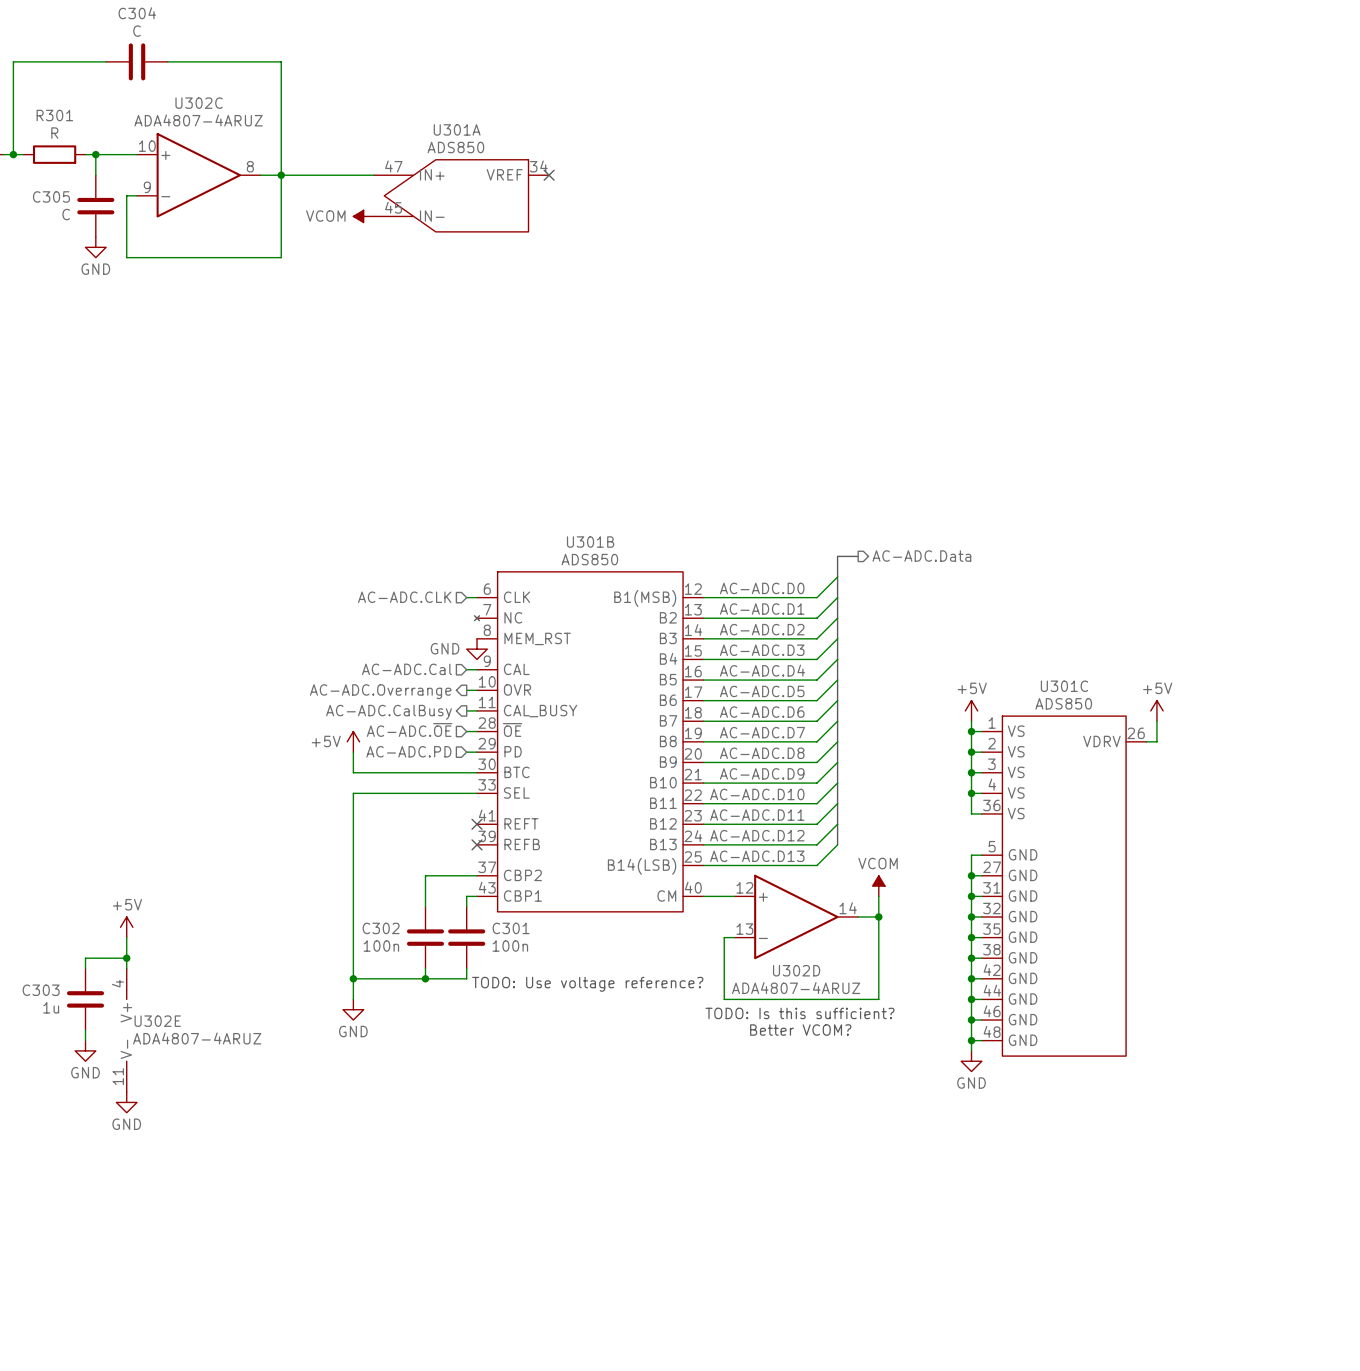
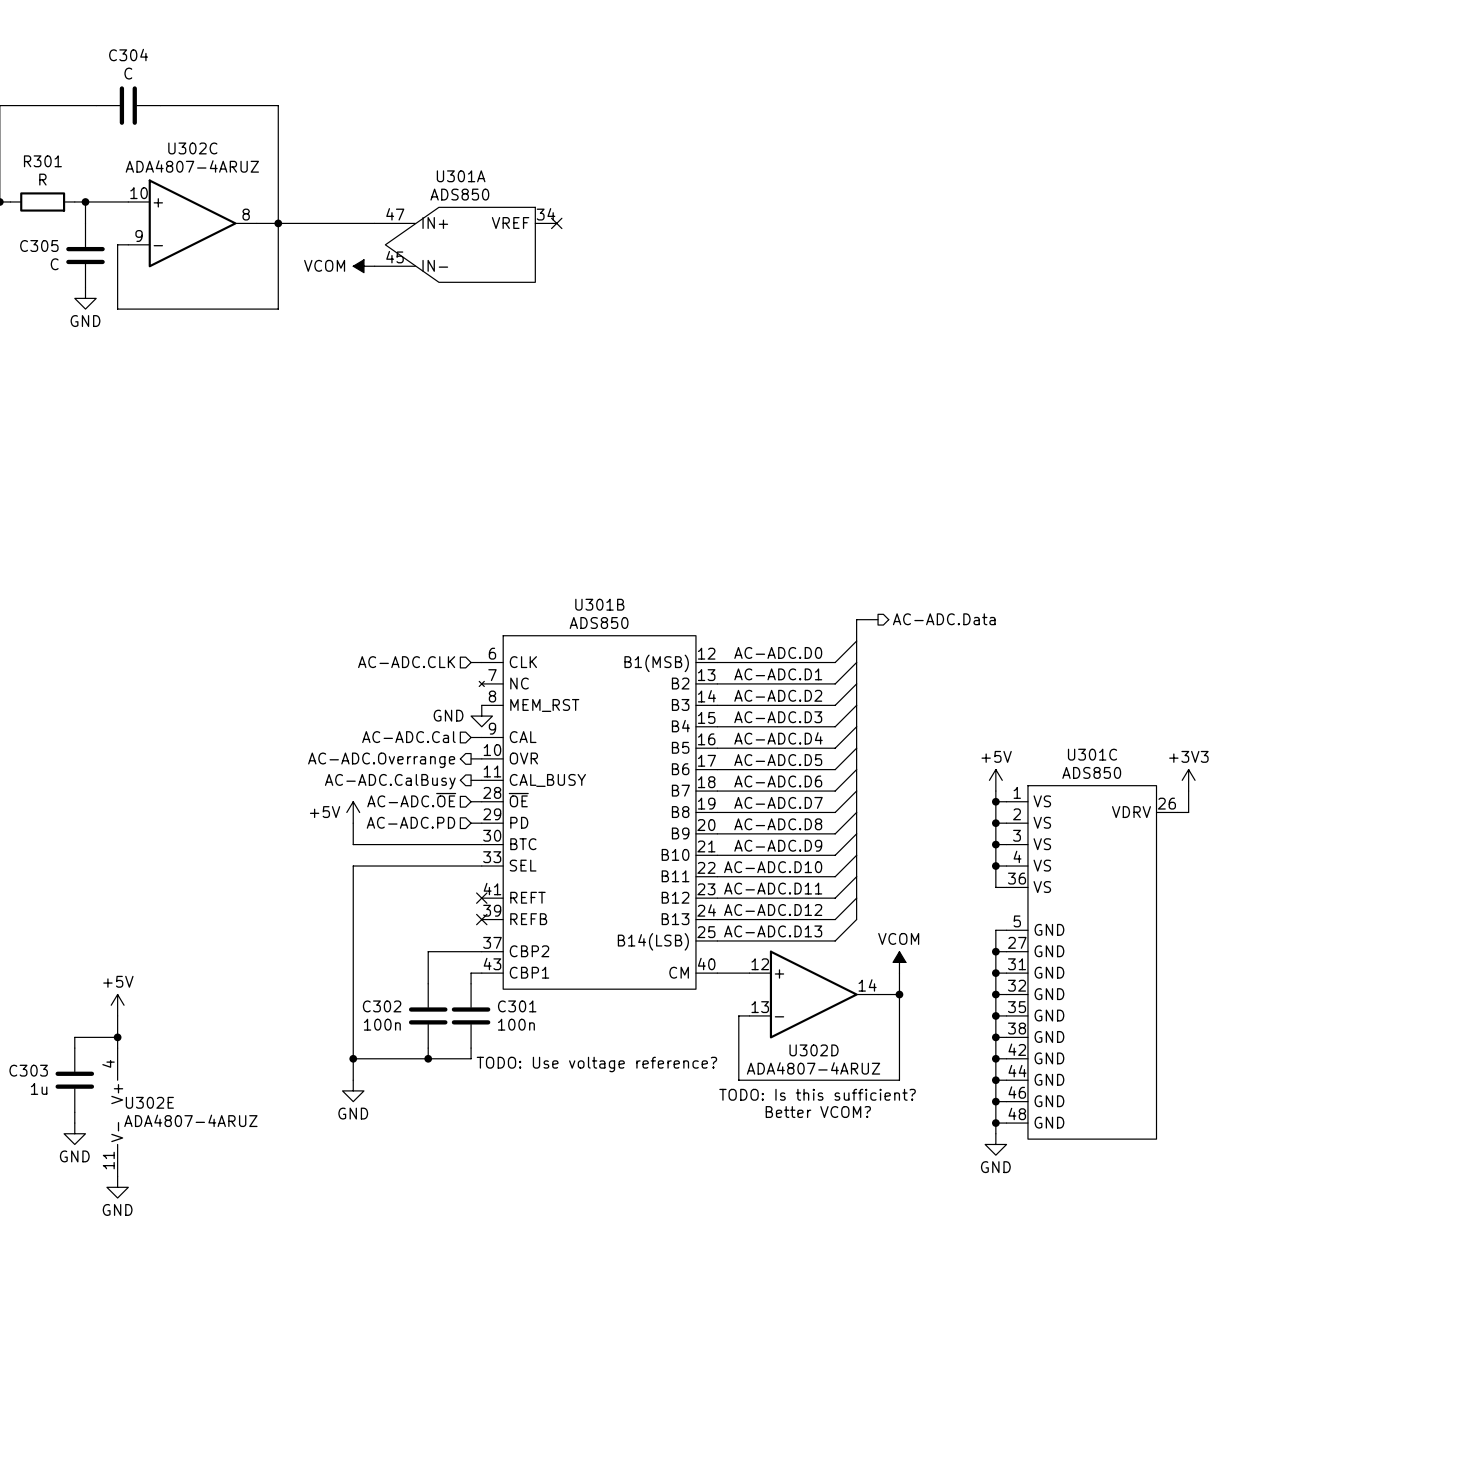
power symbol: +5V (1156, 710) -> +3V3 (1188, 780)

